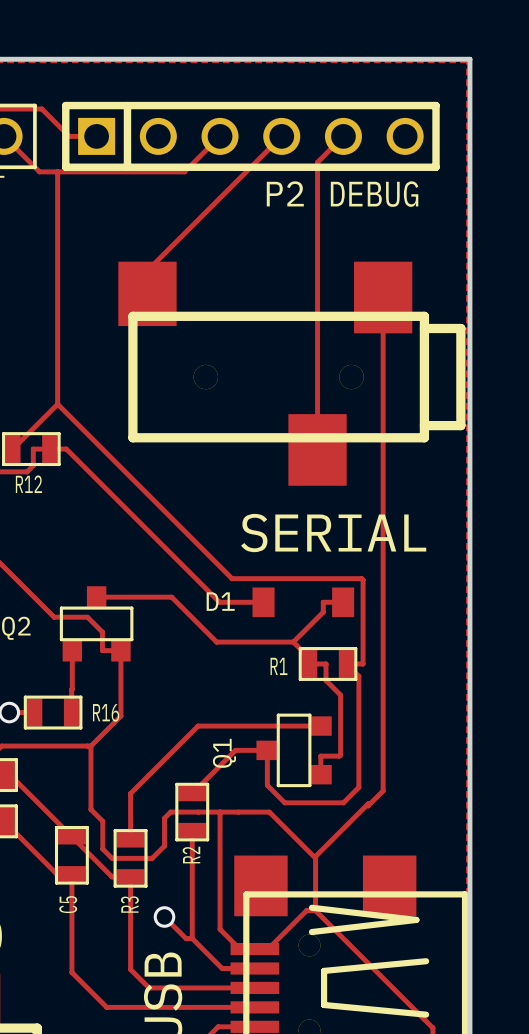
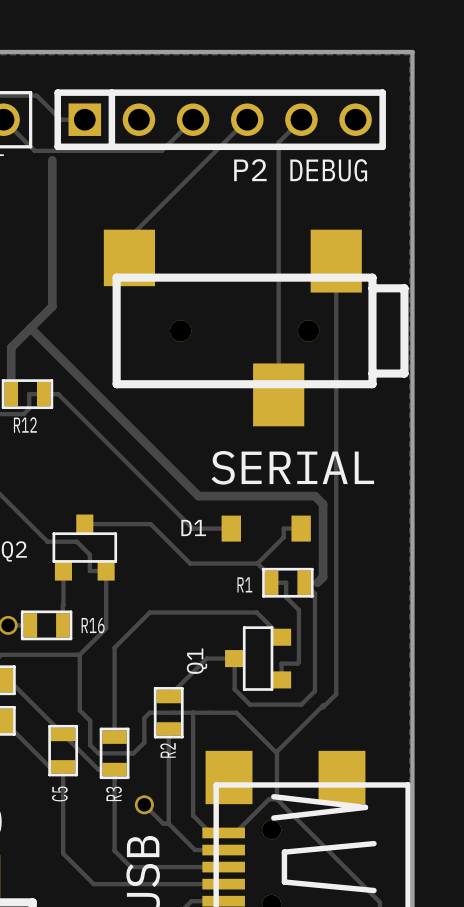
track: (57, 171) (57, 404) -> none
track: none -> (52, 160) (52, 306) (11, 347) (11, 394)
track: (12, 449) (57, 404) (232, 578) (361, 578) (361, 663) -> (30, 328) (198, 496) (314, 496) (323, 504) (323, 577) (317, 582)
track: (320, 726) (198, 726) (130, 793) -> (281, 637) (256, 612) (149, 612) (114, 647) (114, 696)

